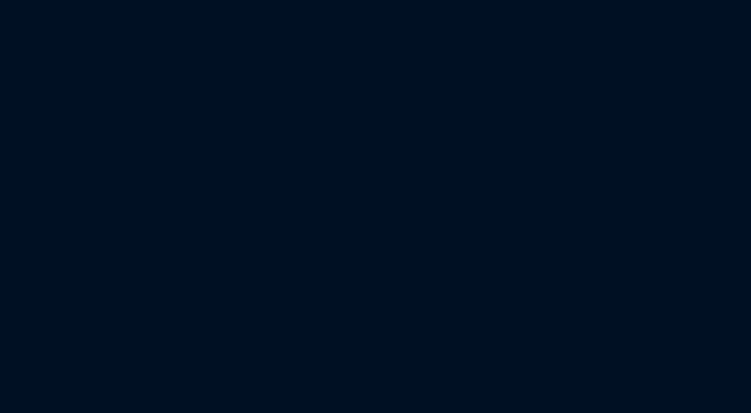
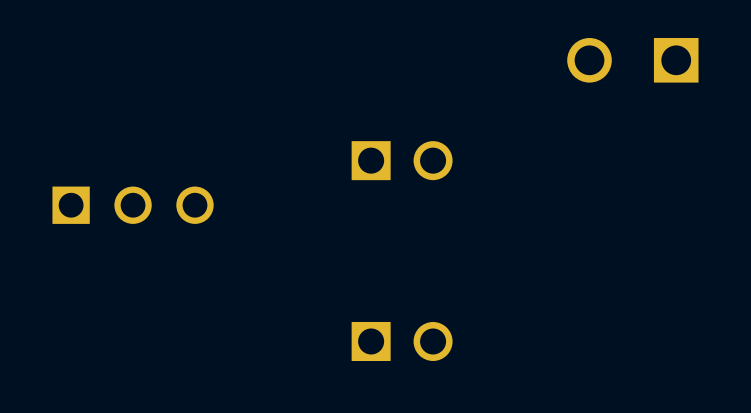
part: none -> (632, 60)
part: none -> (402, 160)
part: none -> (133, 205)
part: none -> (402, 341)

